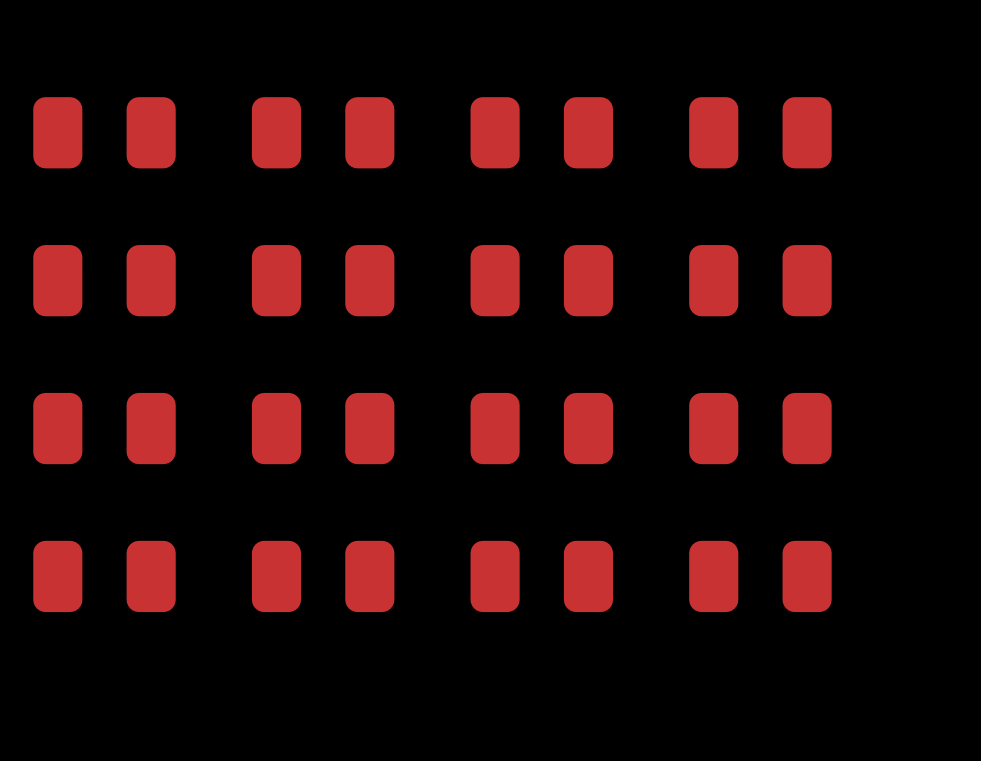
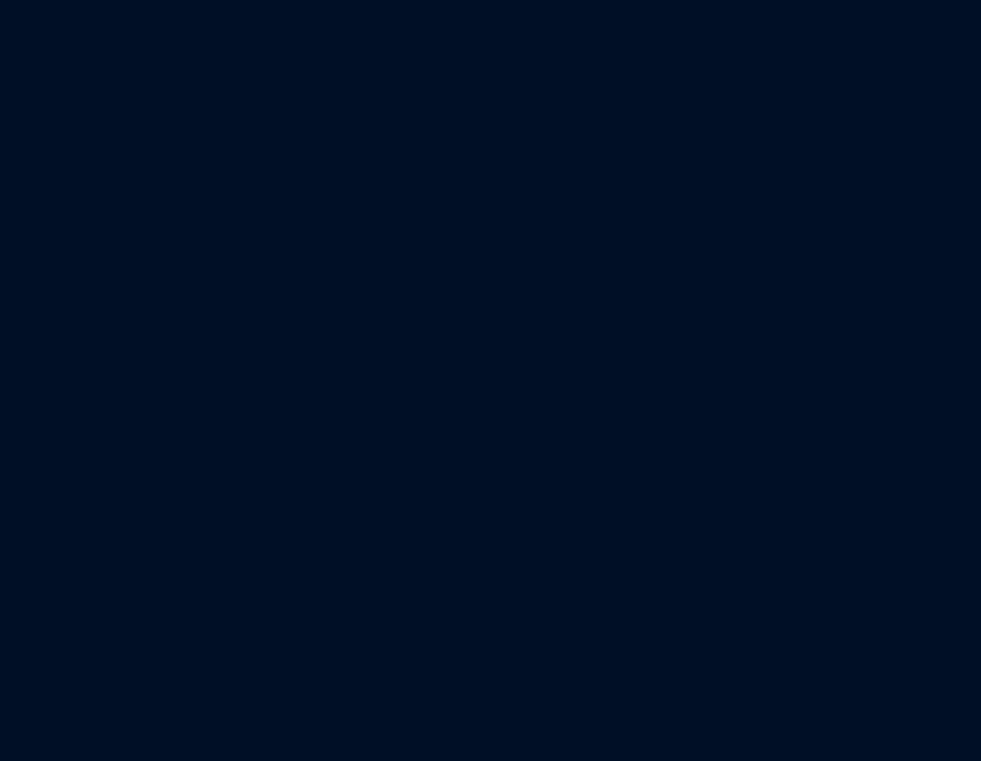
part: (104, 132) -> none
part: (323, 132) -> none
part: (541, 132) -> none
part: (760, 132) -> none
part: (104, 280) -> none
part: (323, 280) -> none
part: (541, 280) -> none
part: (760, 280) -> none
part: (104, 428) -> none
part: (323, 428) -> none
part: (541, 428) -> none
part: (760, 428) -> none
part: (104, 576) -> none
part: (323, 576) -> none
part: (541, 576) -> none
part: (760, 576) -> none

